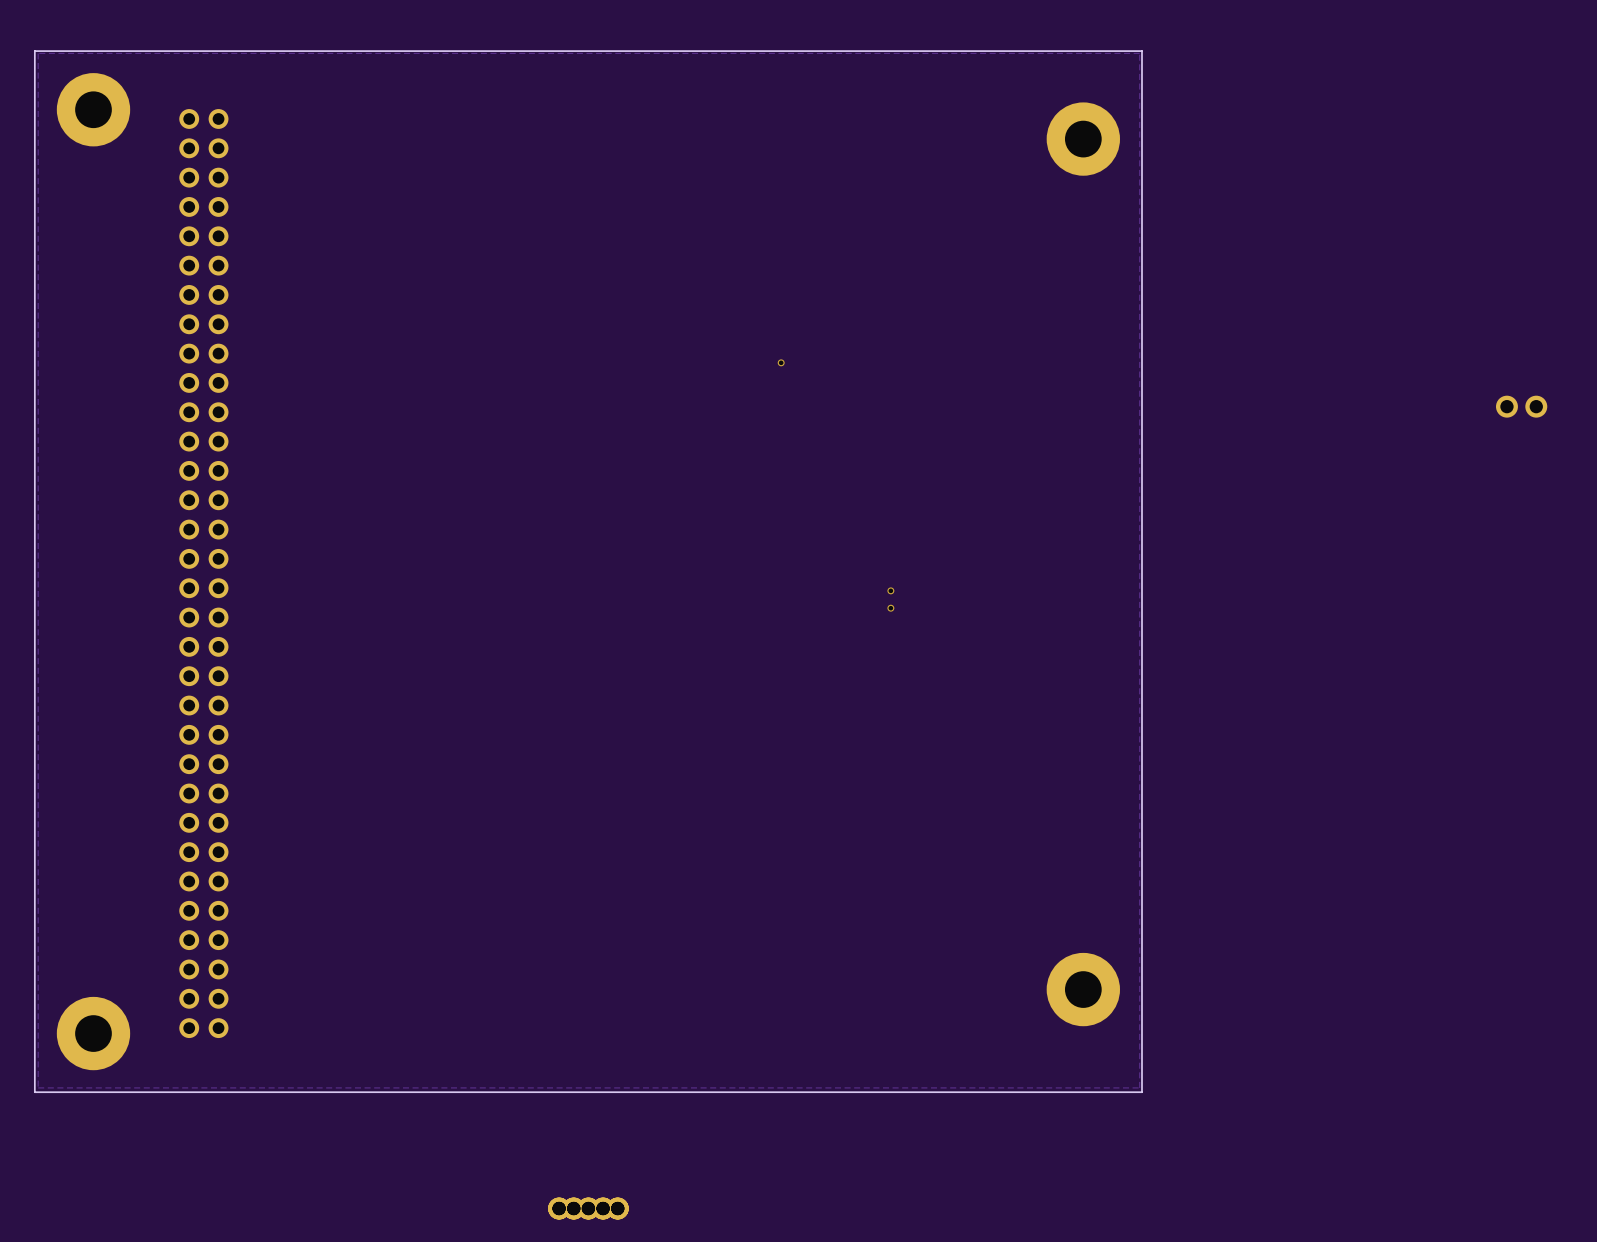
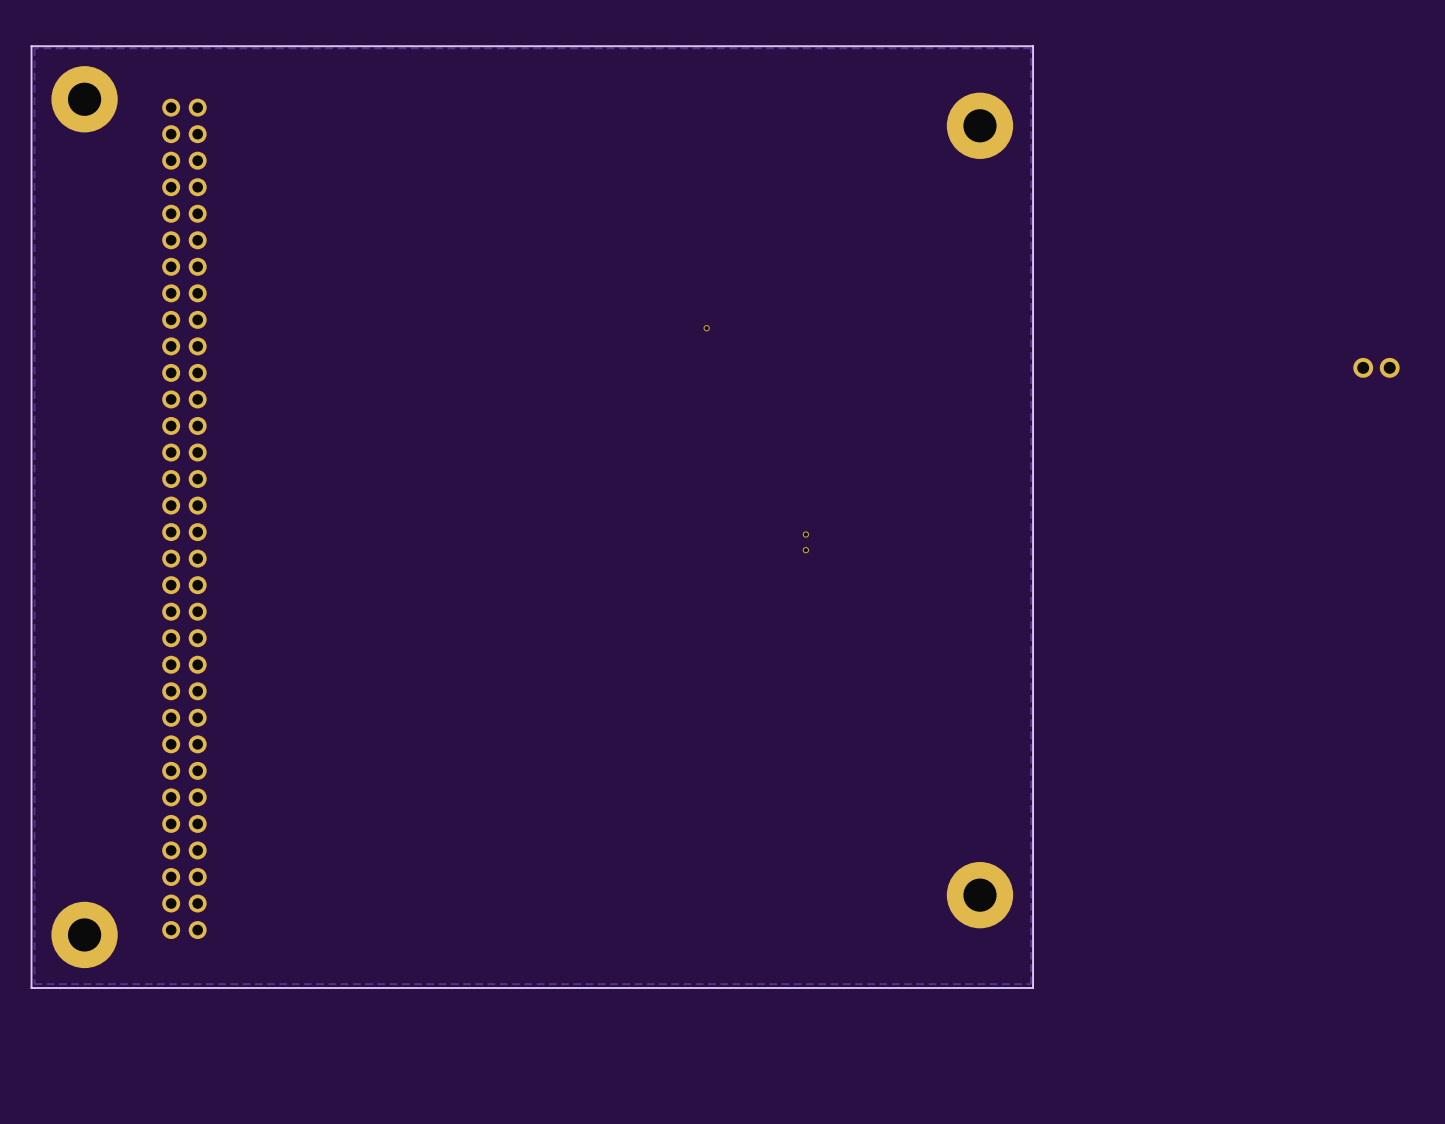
part: (588, 1208) -> none
part: (588, 1208) -> none

